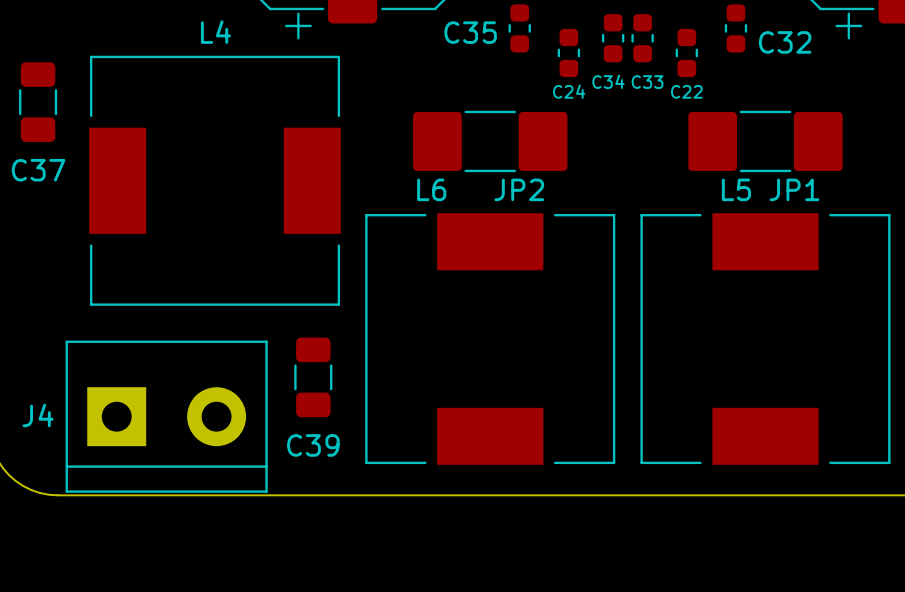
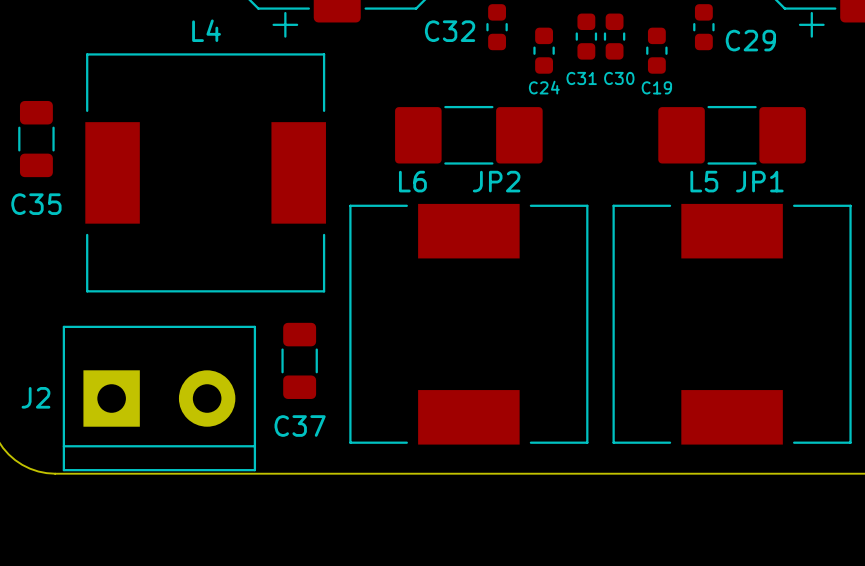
C35 name: C35 (470, 32) -> C32 (450, 31)
C32 name: C32 (785, 42) -> C29 (750, 40)
C34 name: C34 (608, 81) -> C31 (581, 78)
C33 name: C33 (647, 82) -> C30 (619, 78)
C22 name: C22 (686, 91) -> C19 (656, 87)
C37: (38, 102) -> none
C35: none -> (36, 139)
J4 name: J4 (38, 415) -> J2 (35, 397)
C39 name: C39 (313, 445) -> C37 (300, 426)

